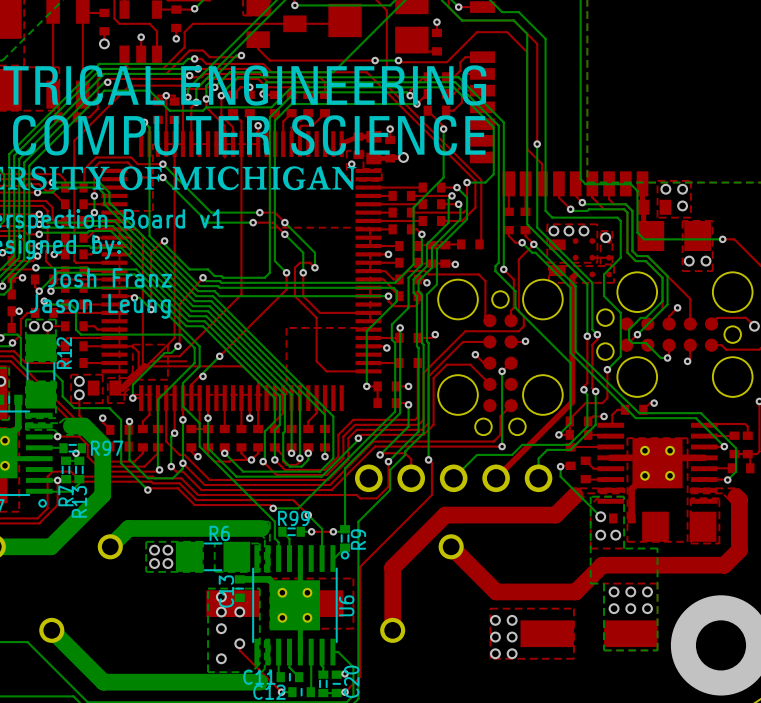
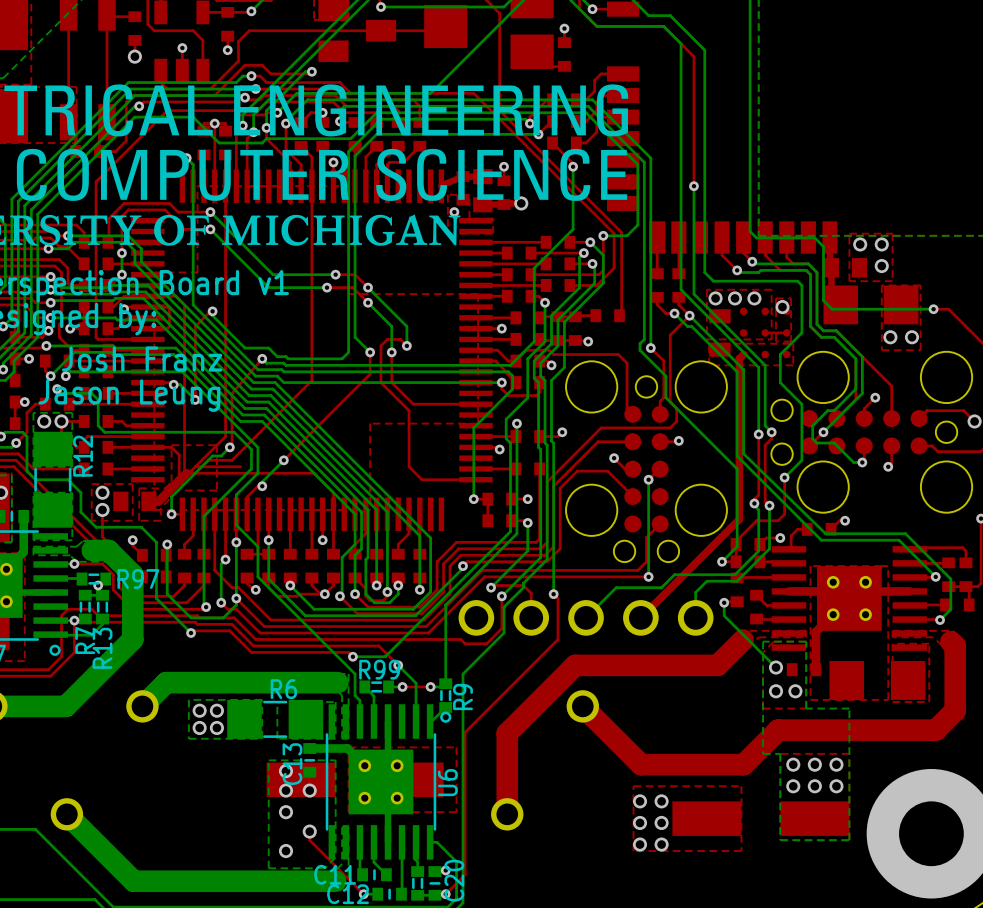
top track: (258, 39) (258, 48) (269, 60) (375, 60) -> none
via: (375, 60) -> none
top track: (398, 60) (400, 62) (446, 62) (477, 32) (507, 32) (527, 52) (527, 149) (542, 164) (542, 183) -> none
bottom track: (398, 60) (375, 60) -> none
via: (398, 60) -> none

